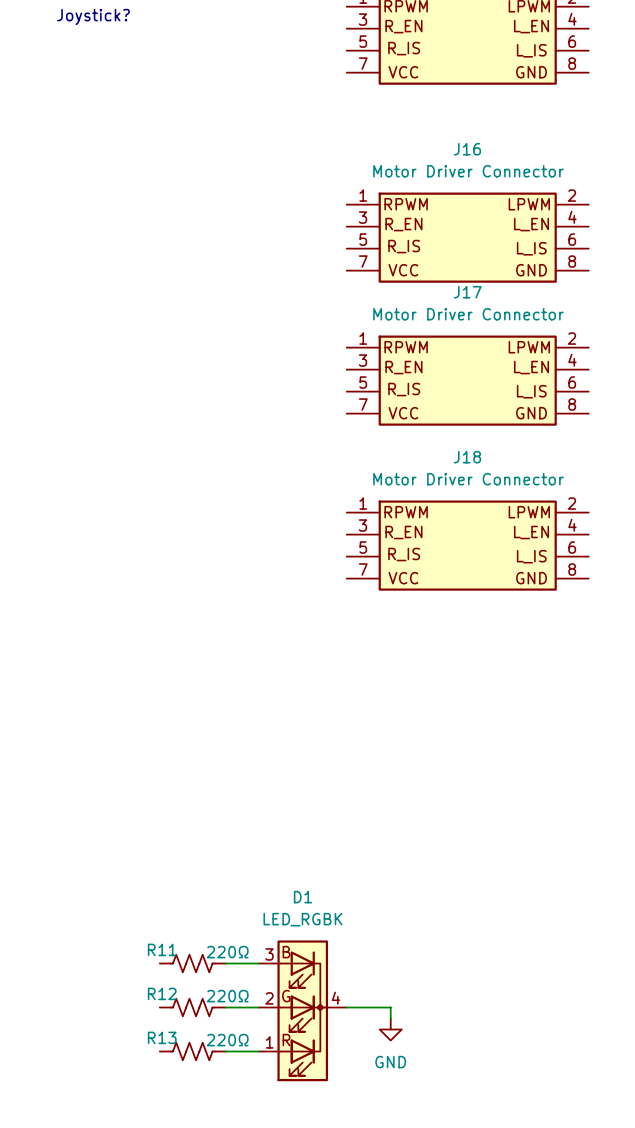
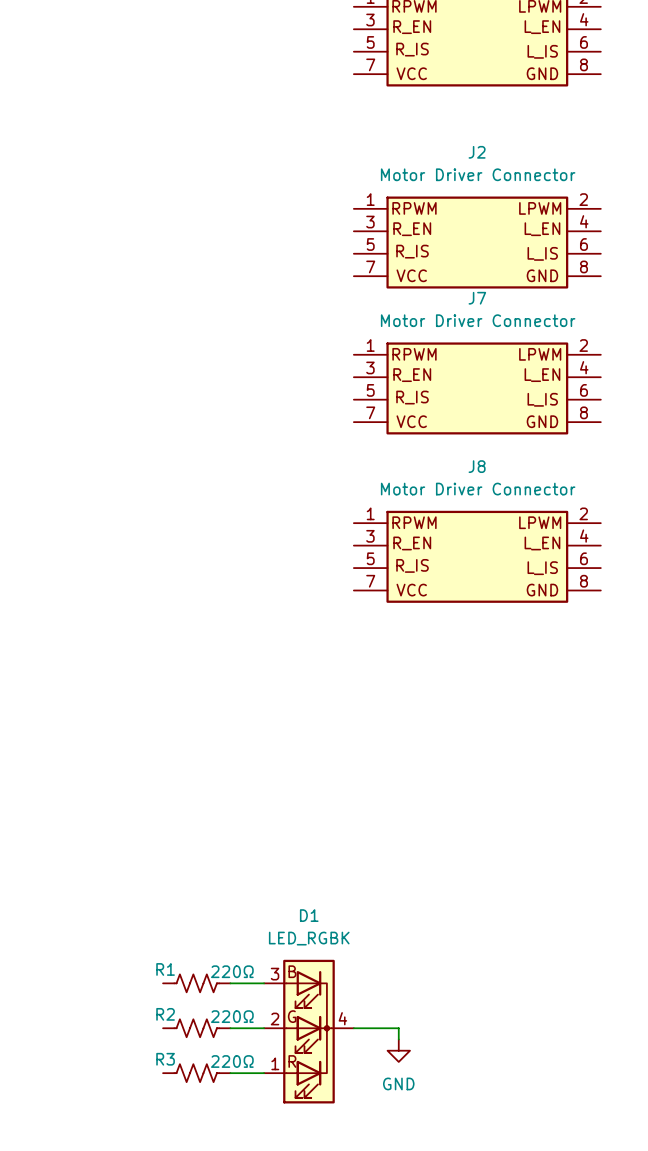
text: Joystick? (93, 16) -> none
J16 name: J16 (467, 149) -> J2 (477, 152)
J17 name: J17 (467, 292) -> J7 (477, 298)
J18 name: J18 (467, 457) -> J8 (477, 466)
R11 name: R11 (162, 949) -> R1 (165, 969)
R12 name: R12 (162, 993) -> R2 (165, 1014)
R13 name: R13 (162, 1037) -> R3 (165, 1059)

